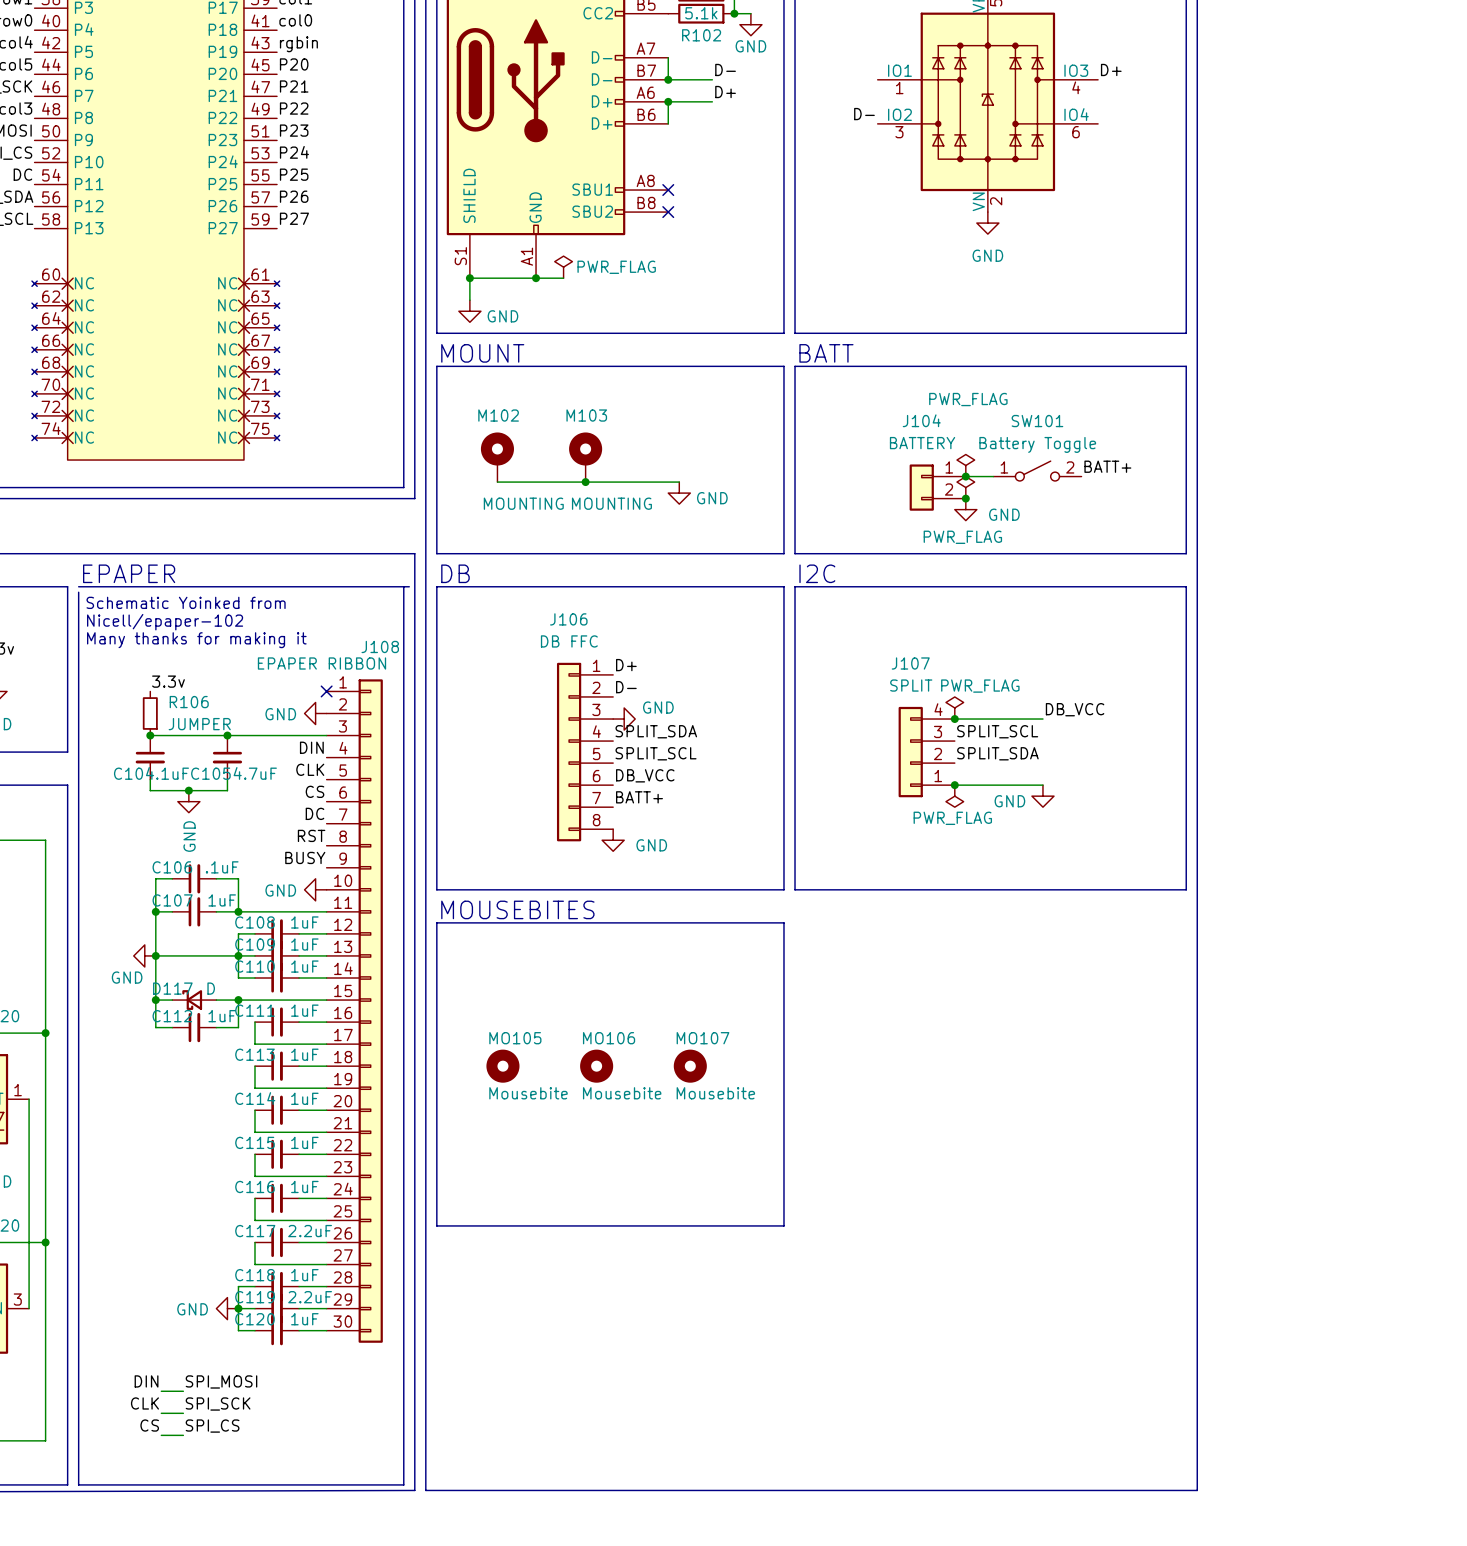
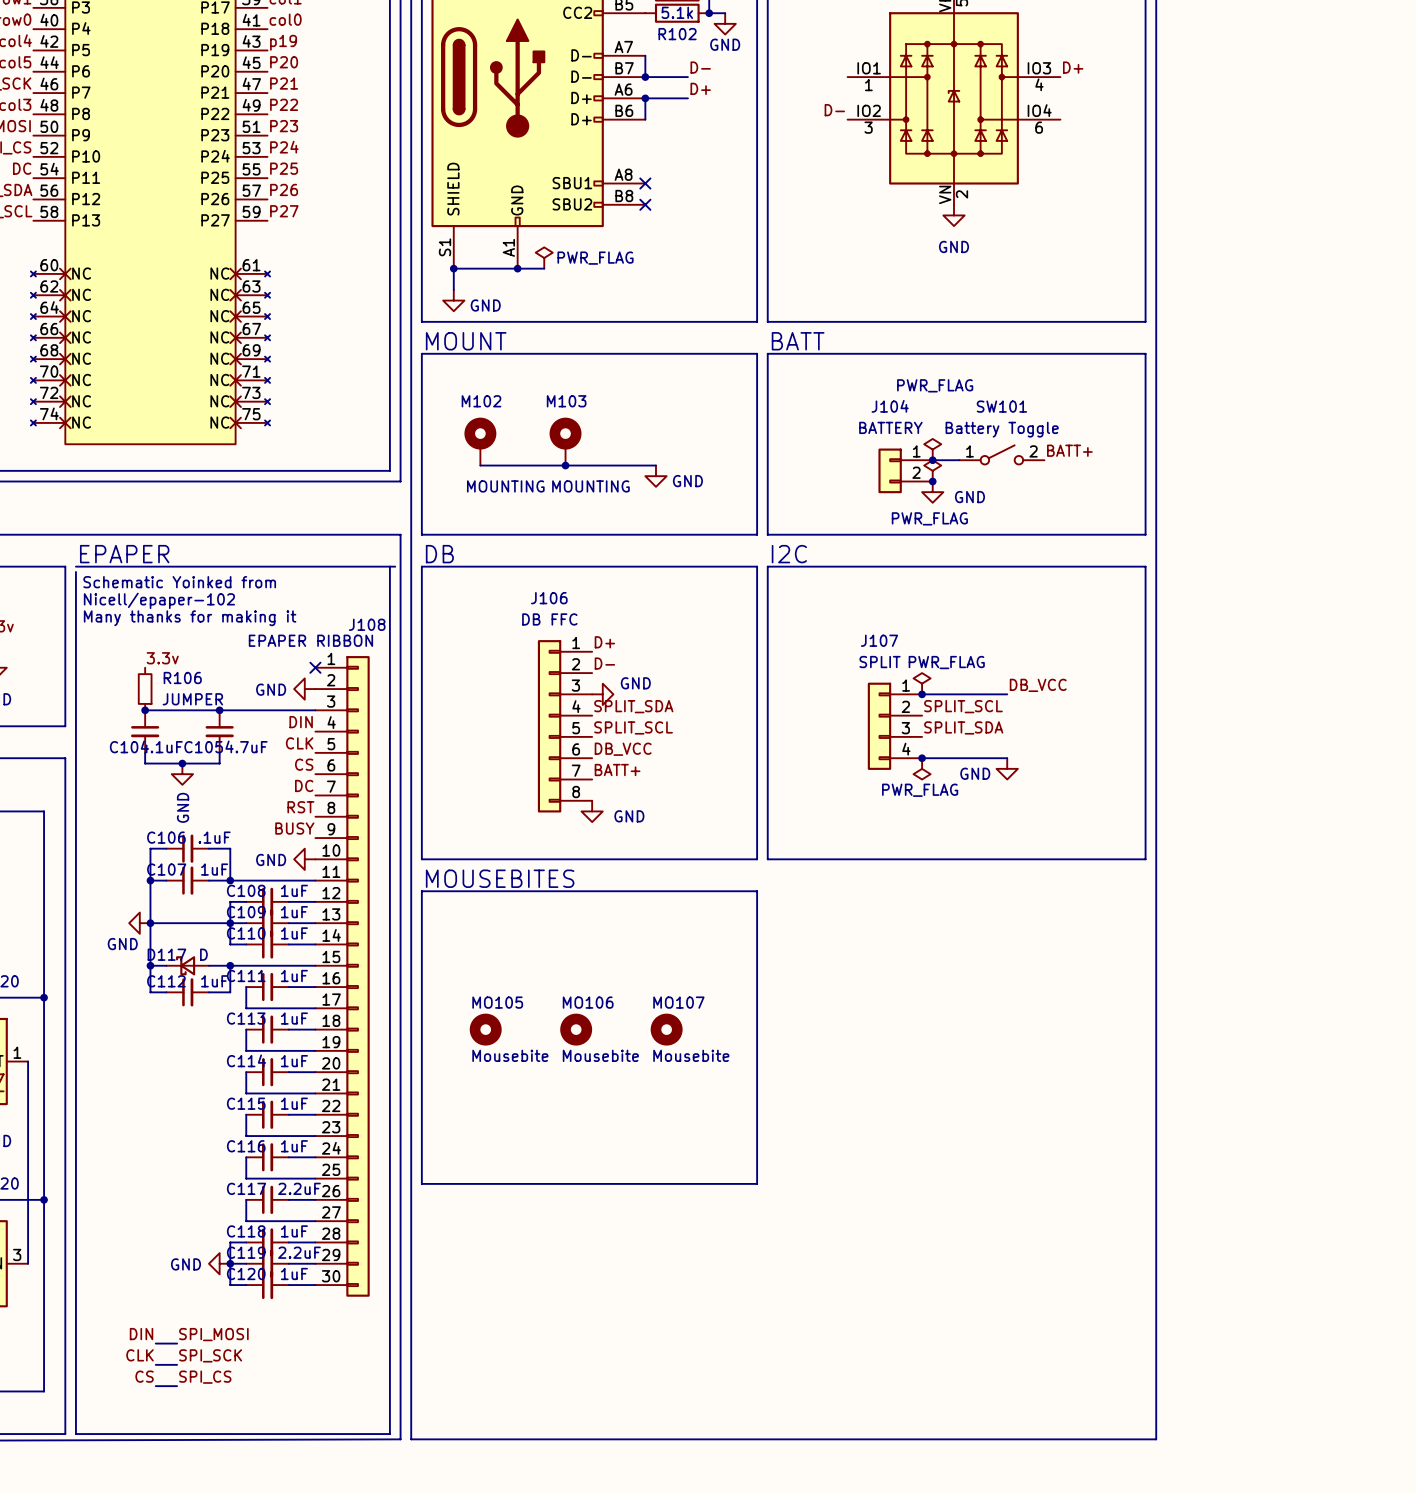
label: rgbin (298, 44) -> p19 (283, 42)
J107 flip: as is (910, 752) -> up-down (879, 726)

